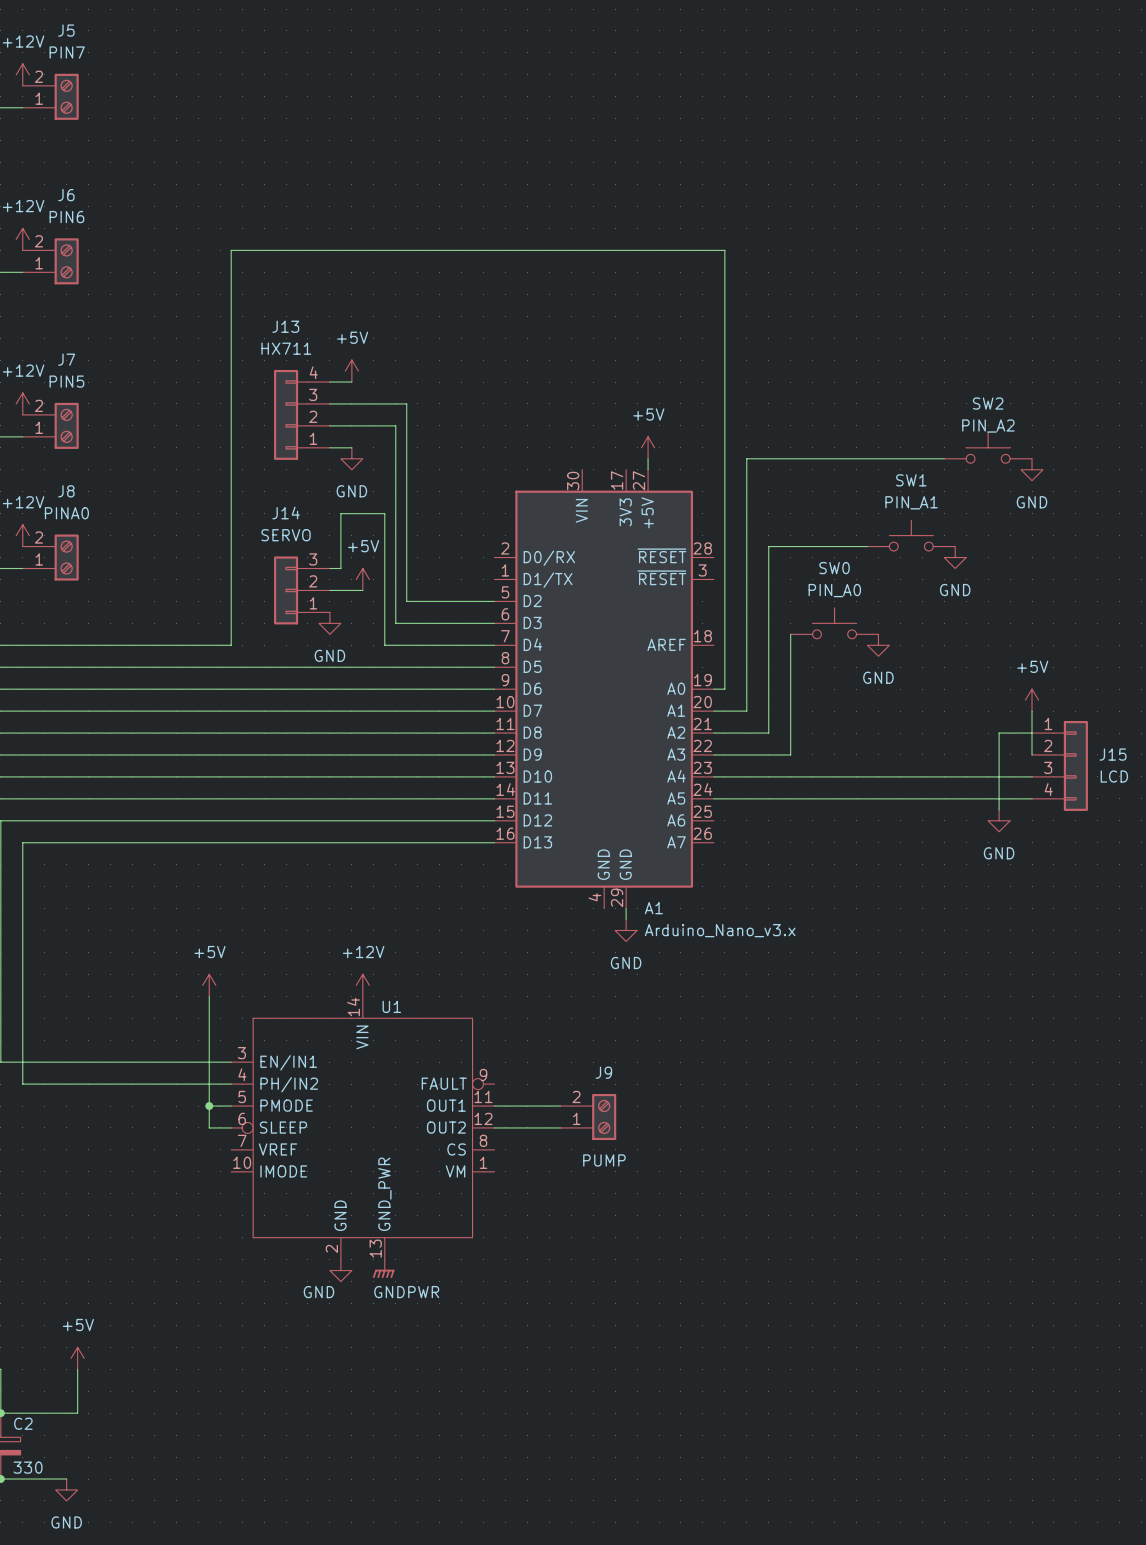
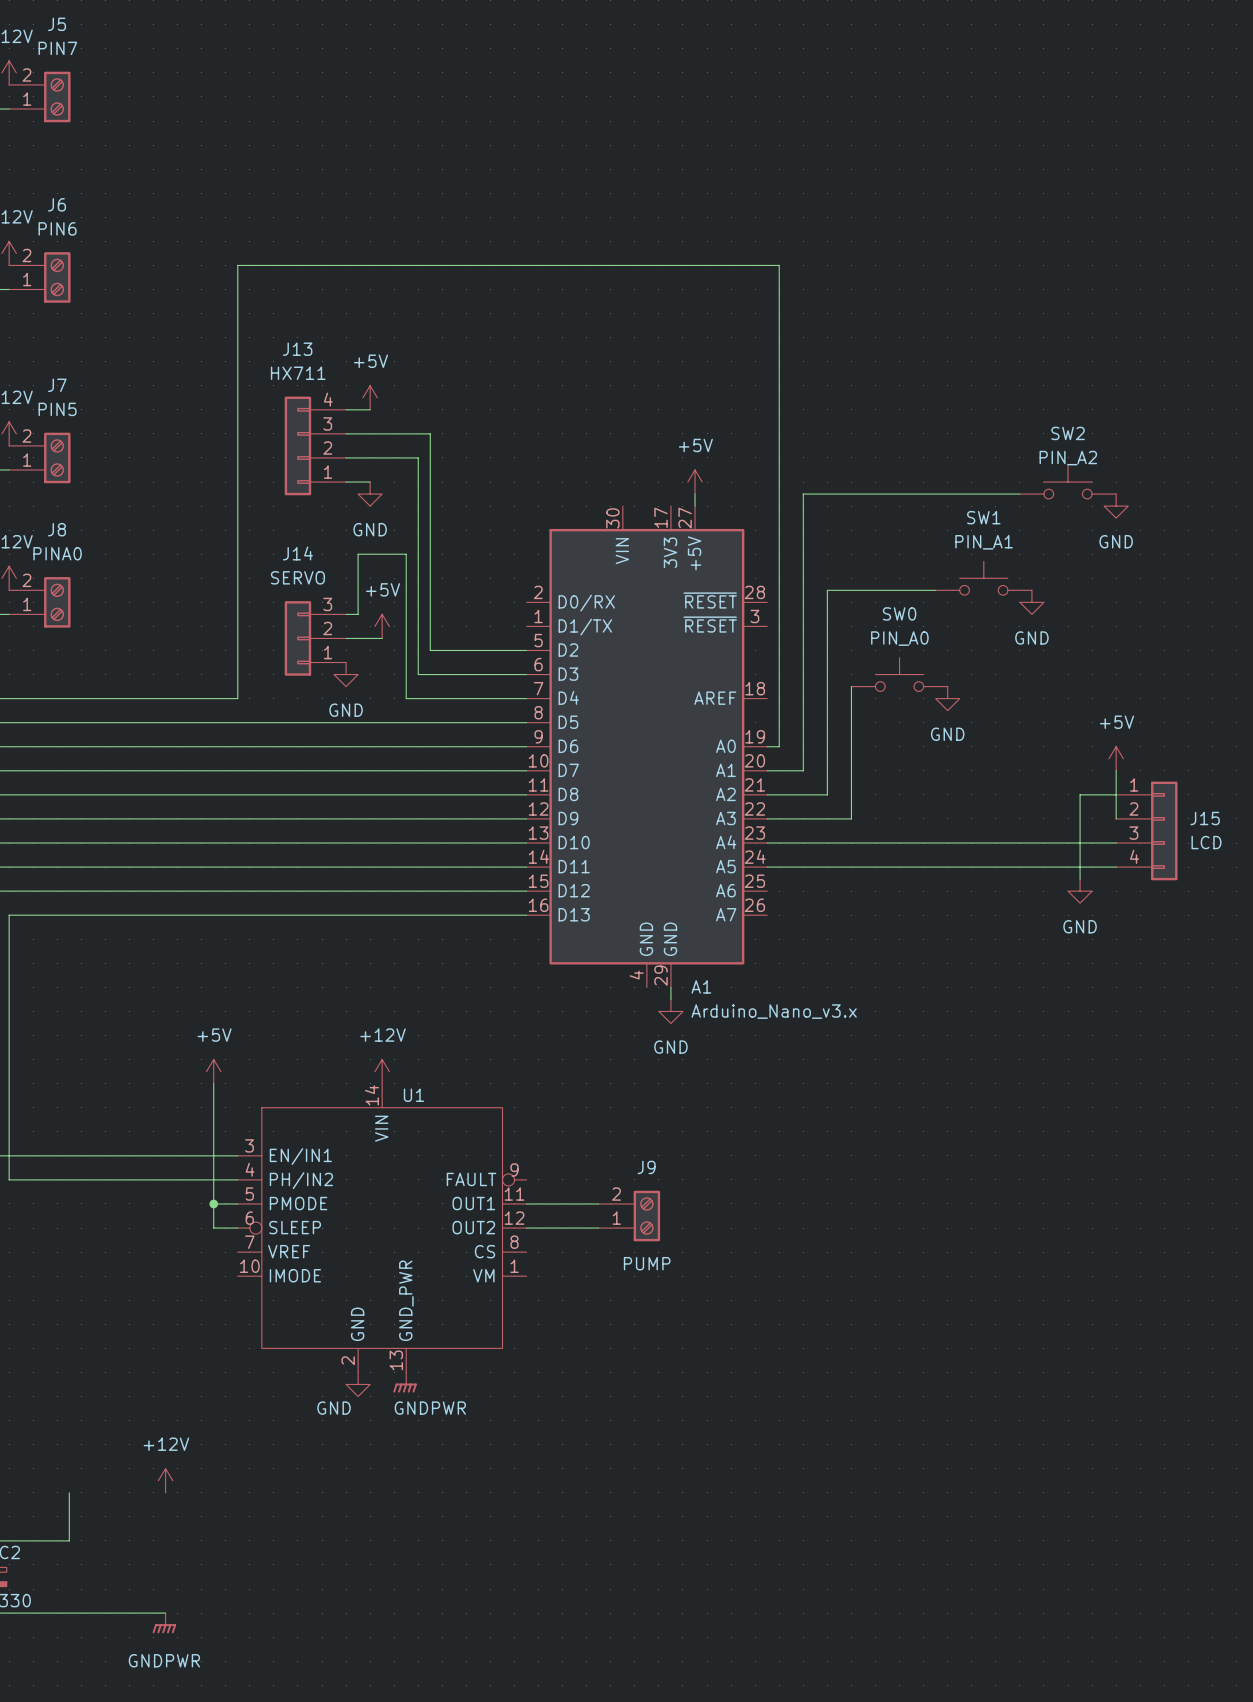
power symbol: +5V (77, 1358) -> none
power symbol: none -> +12V (165, 1480)
wire: none -> (57, 1613) (165, 1613)
power symbol: none -> GNDPWR (164, 1623)
power symbol: GND (66, 1489) -> none

